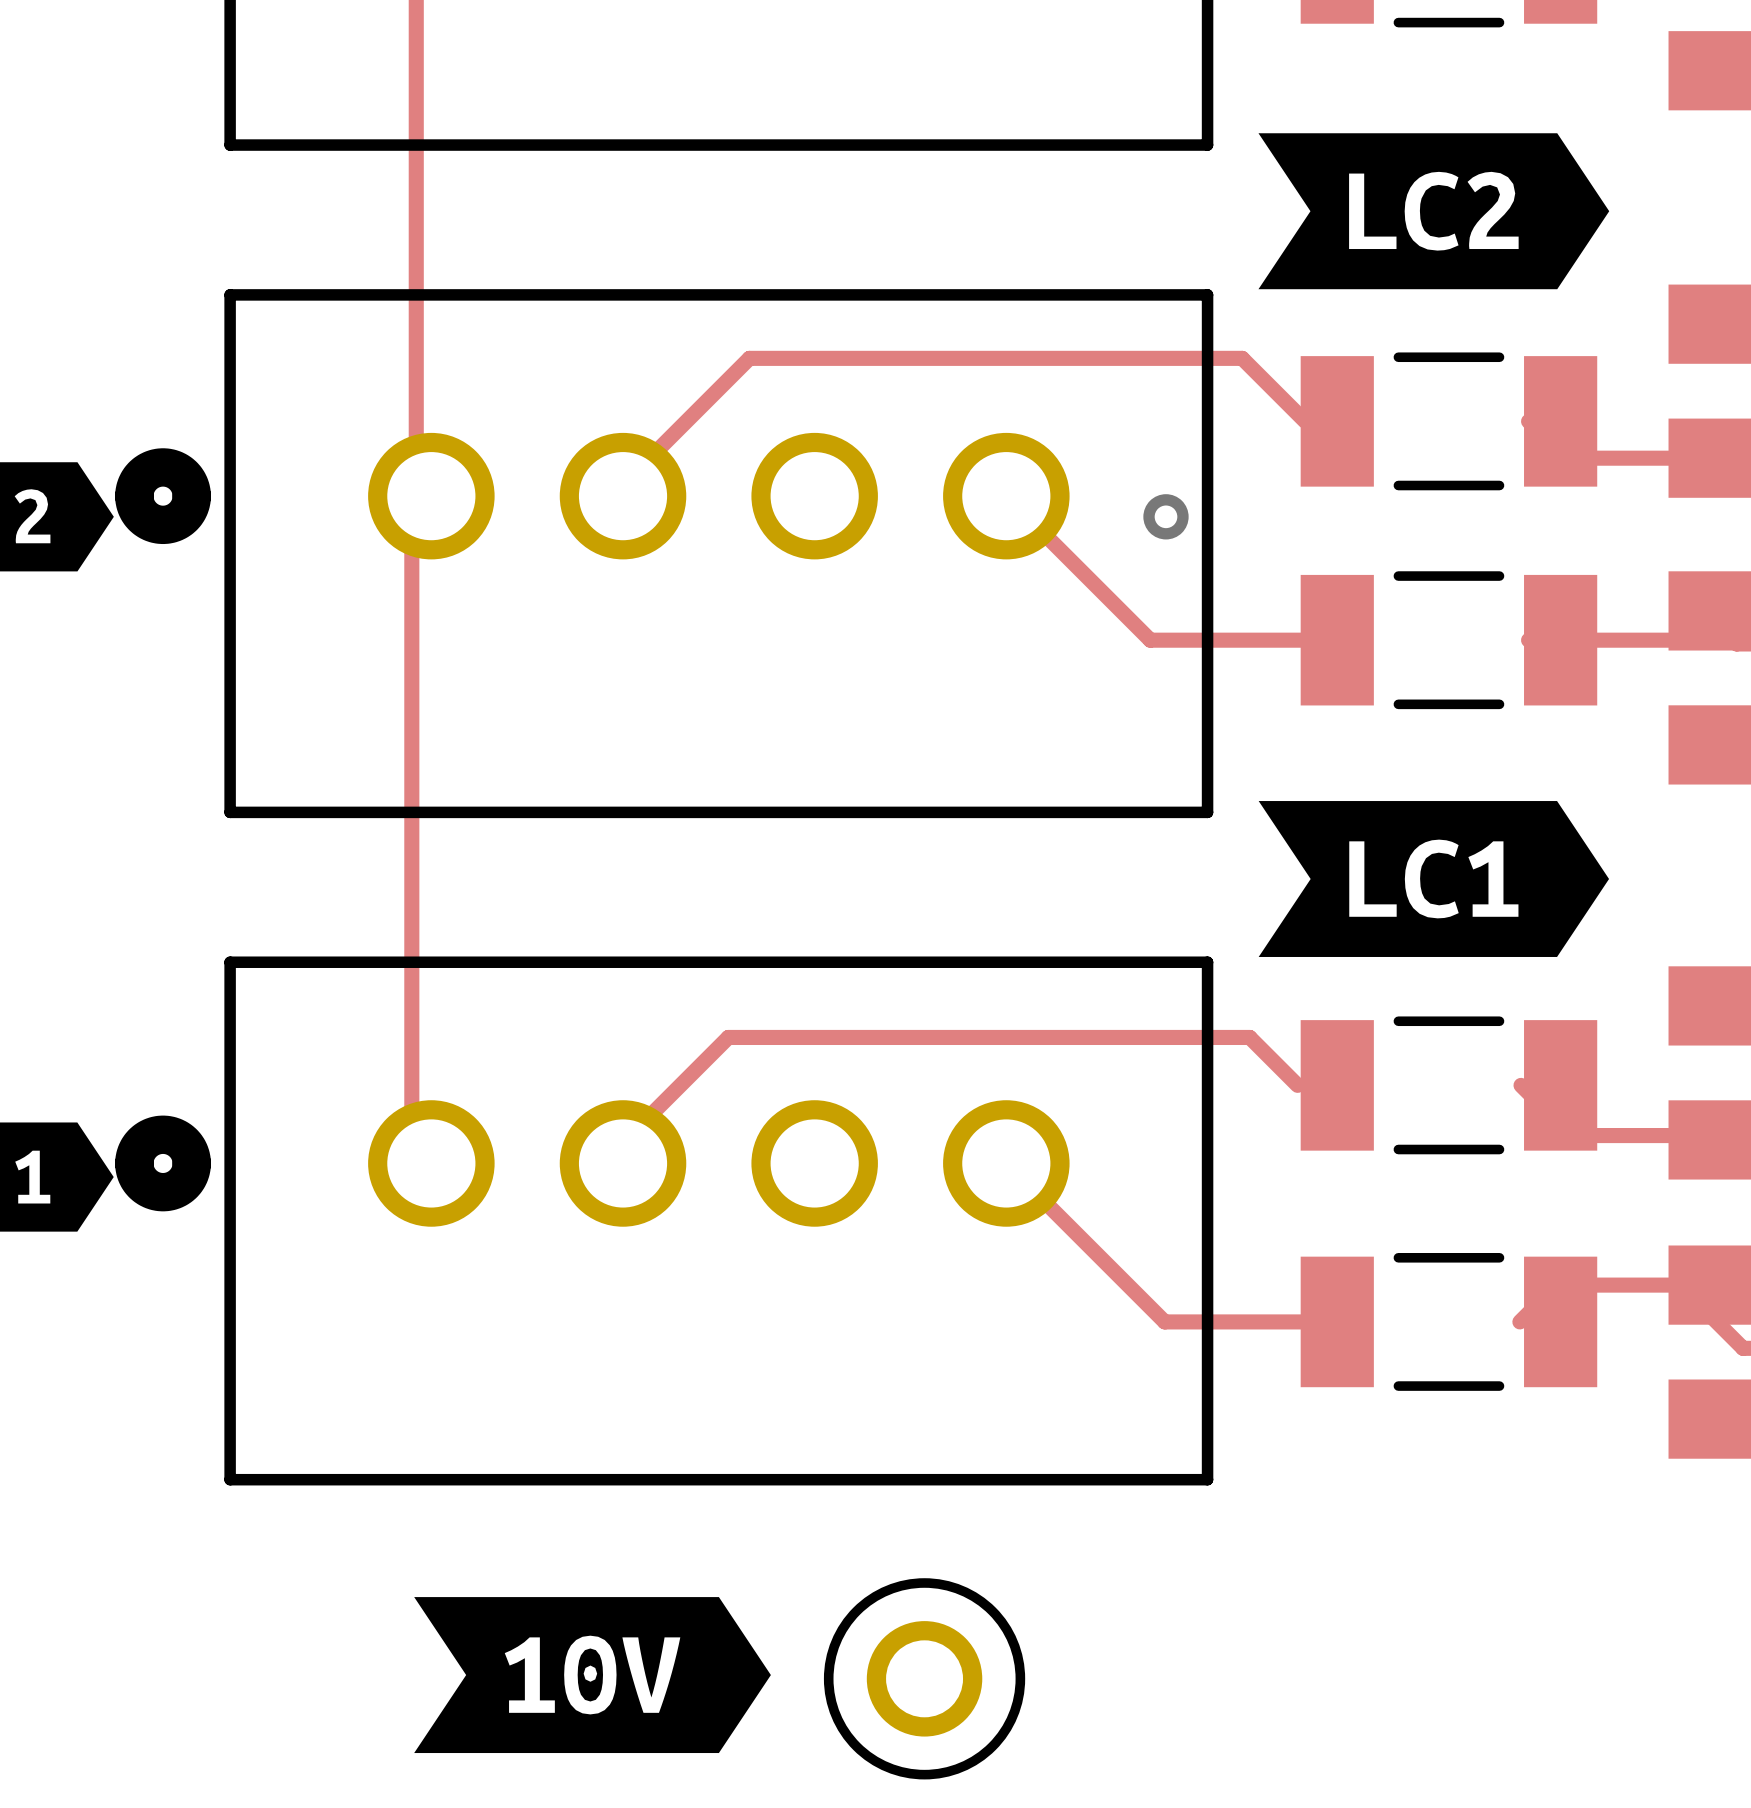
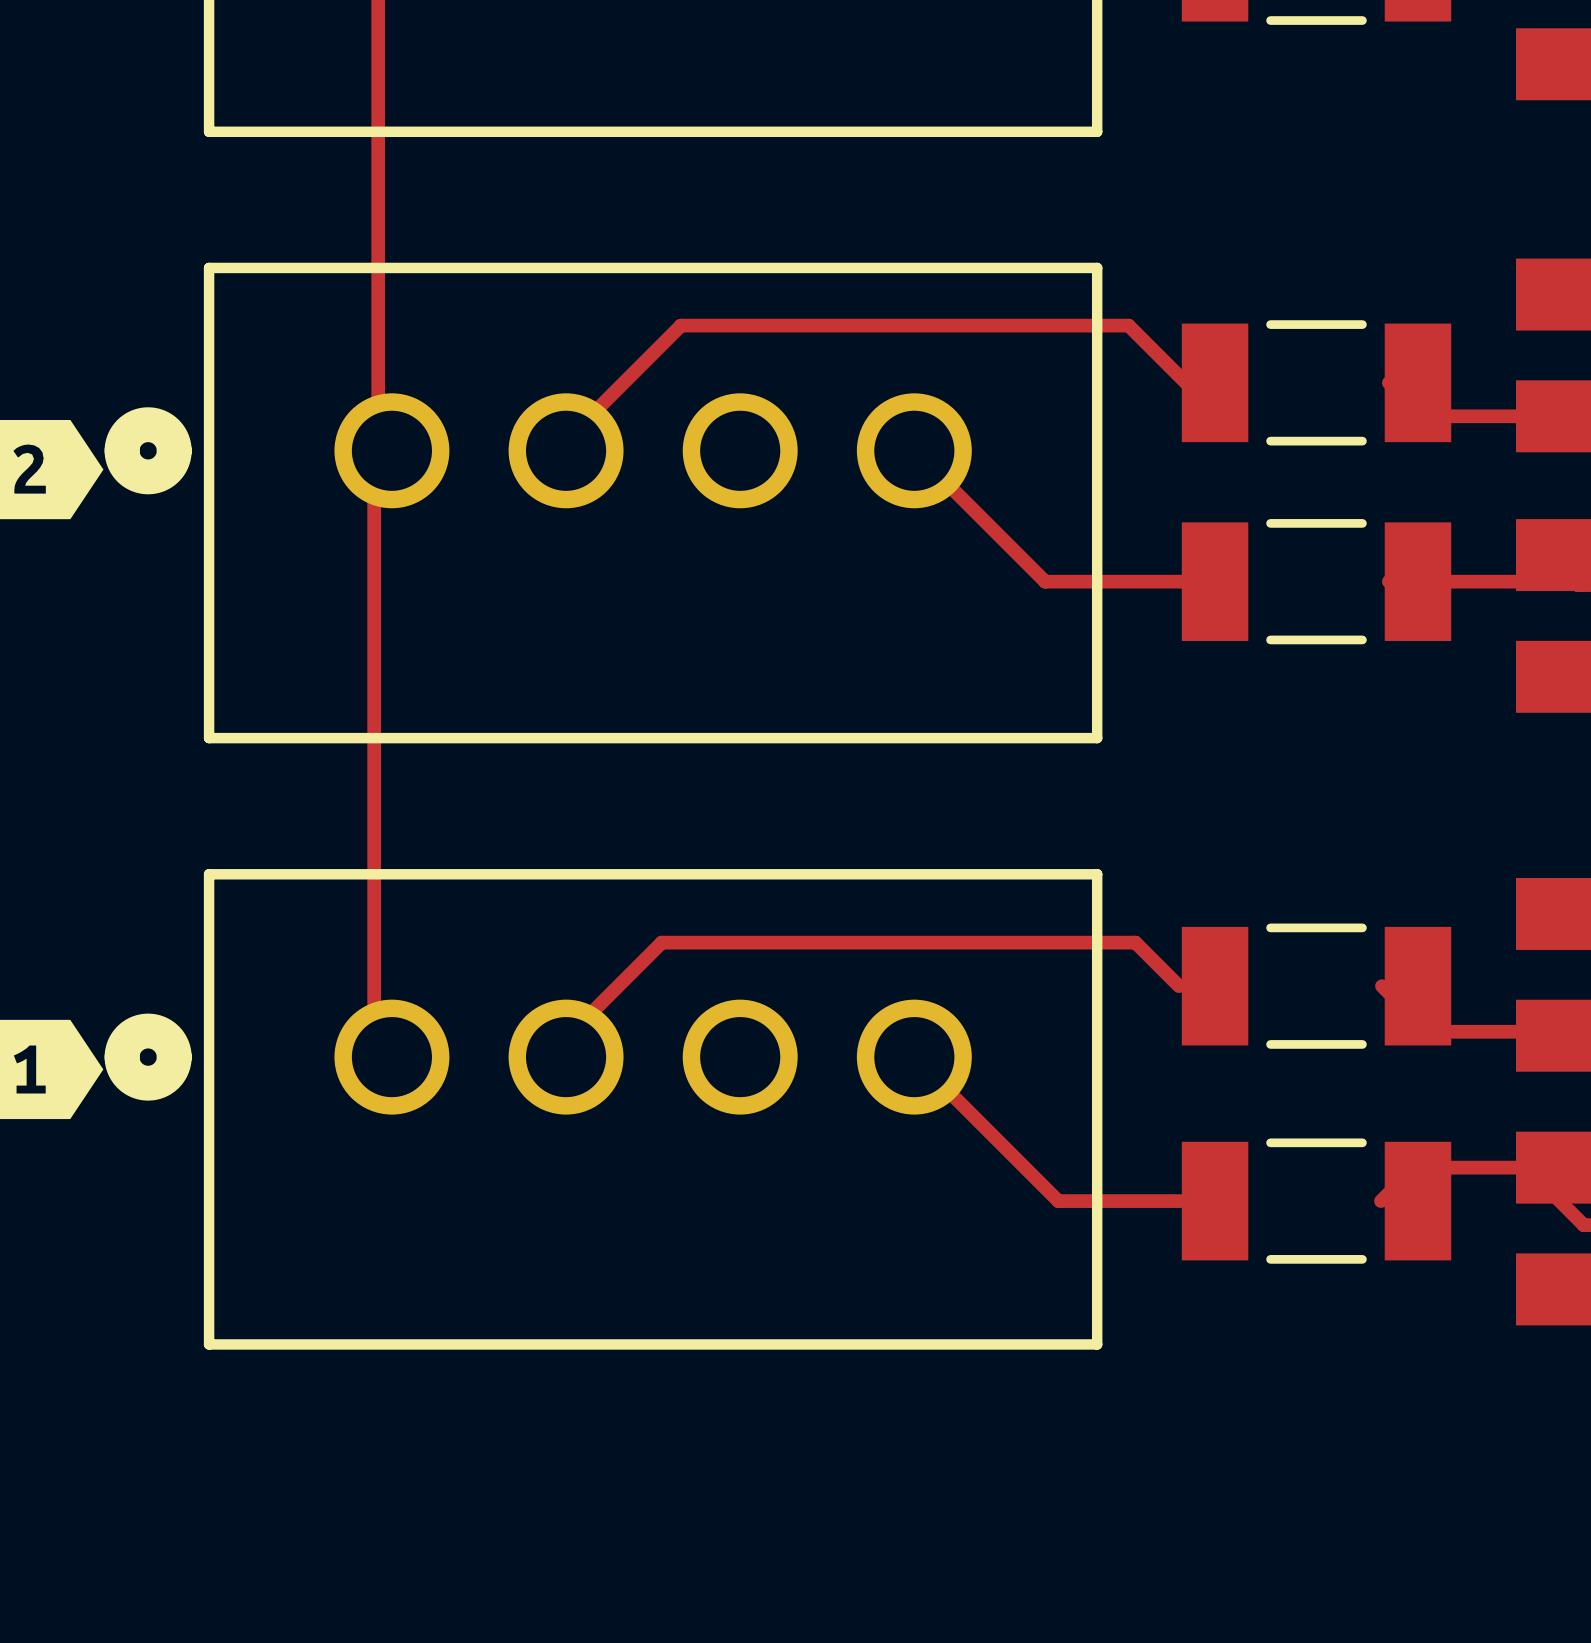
drawing: [1258, 133, 1610, 290] -> none
via: (1165, 516) -> none
drawing: [1258, 801, 1610, 957] -> none
drawing: [414, 1597, 771, 1754] -> none
part: (924, 1678) -> none

